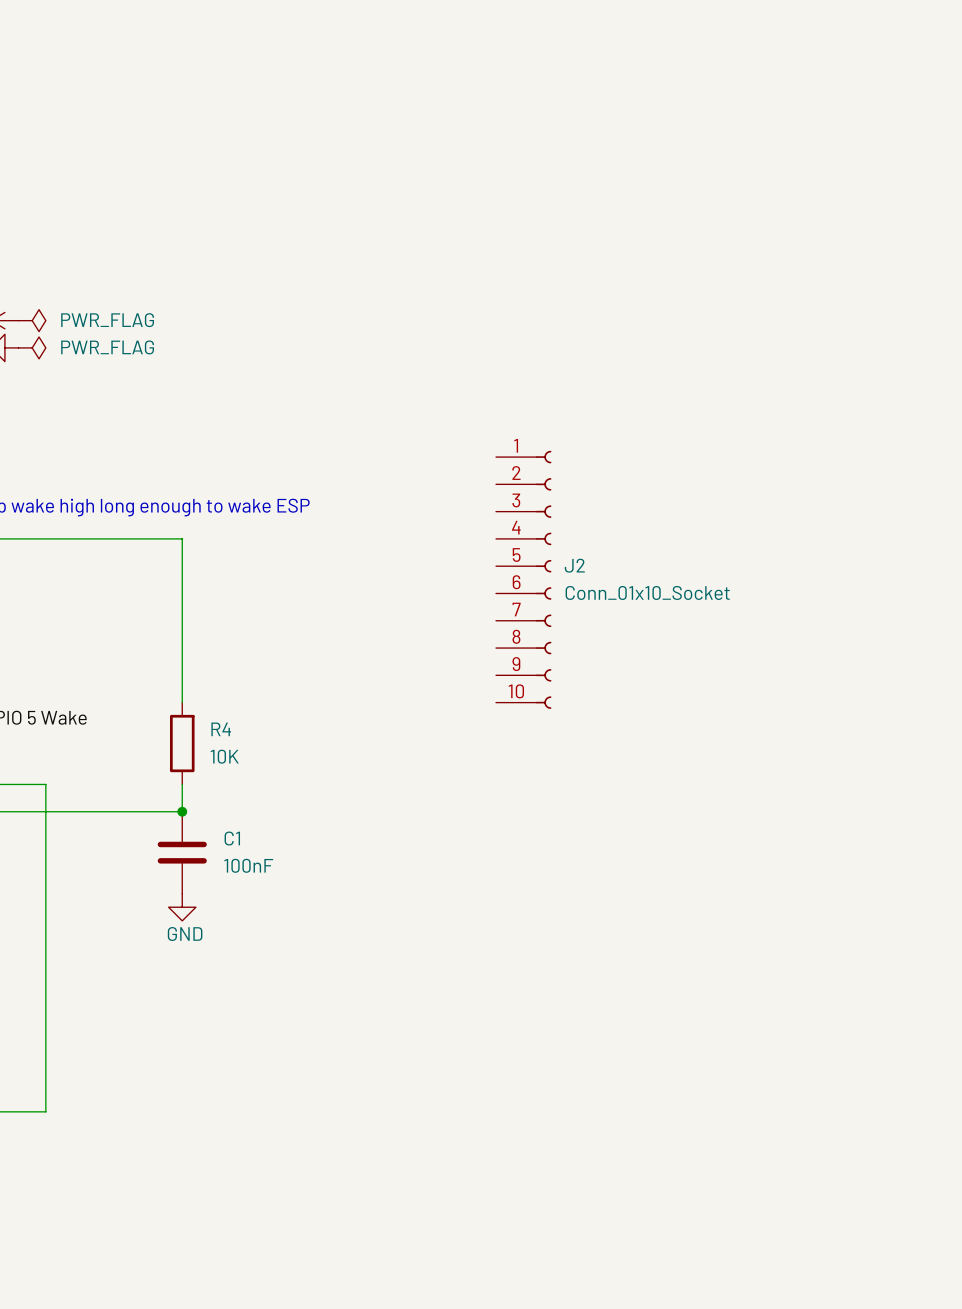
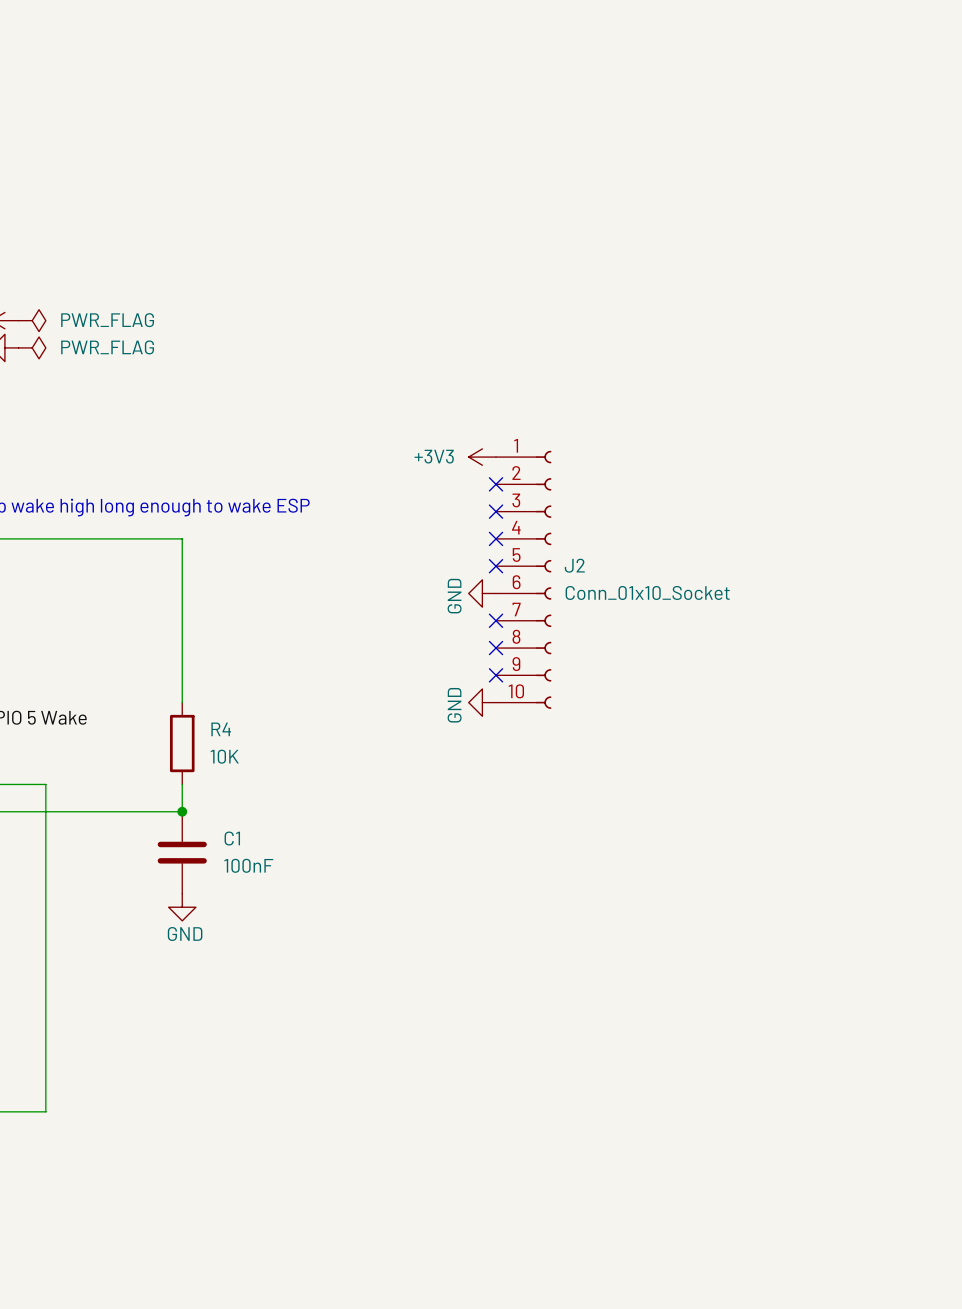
power symbol: none -> +3V3 (482, 457)
no-connect mark: none -> (496, 484)
no-connect mark: none -> (496, 511)
no-connect mark: none -> (496, 538)
no-connect mark: none -> (496, 566)
power symbol: none -> GND (482, 593)
no-connect mark: none -> (496, 620)
no-connect mark: none -> (496, 648)
no-connect mark: none -> (496, 675)
power symbol: none -> GND (482, 702)

